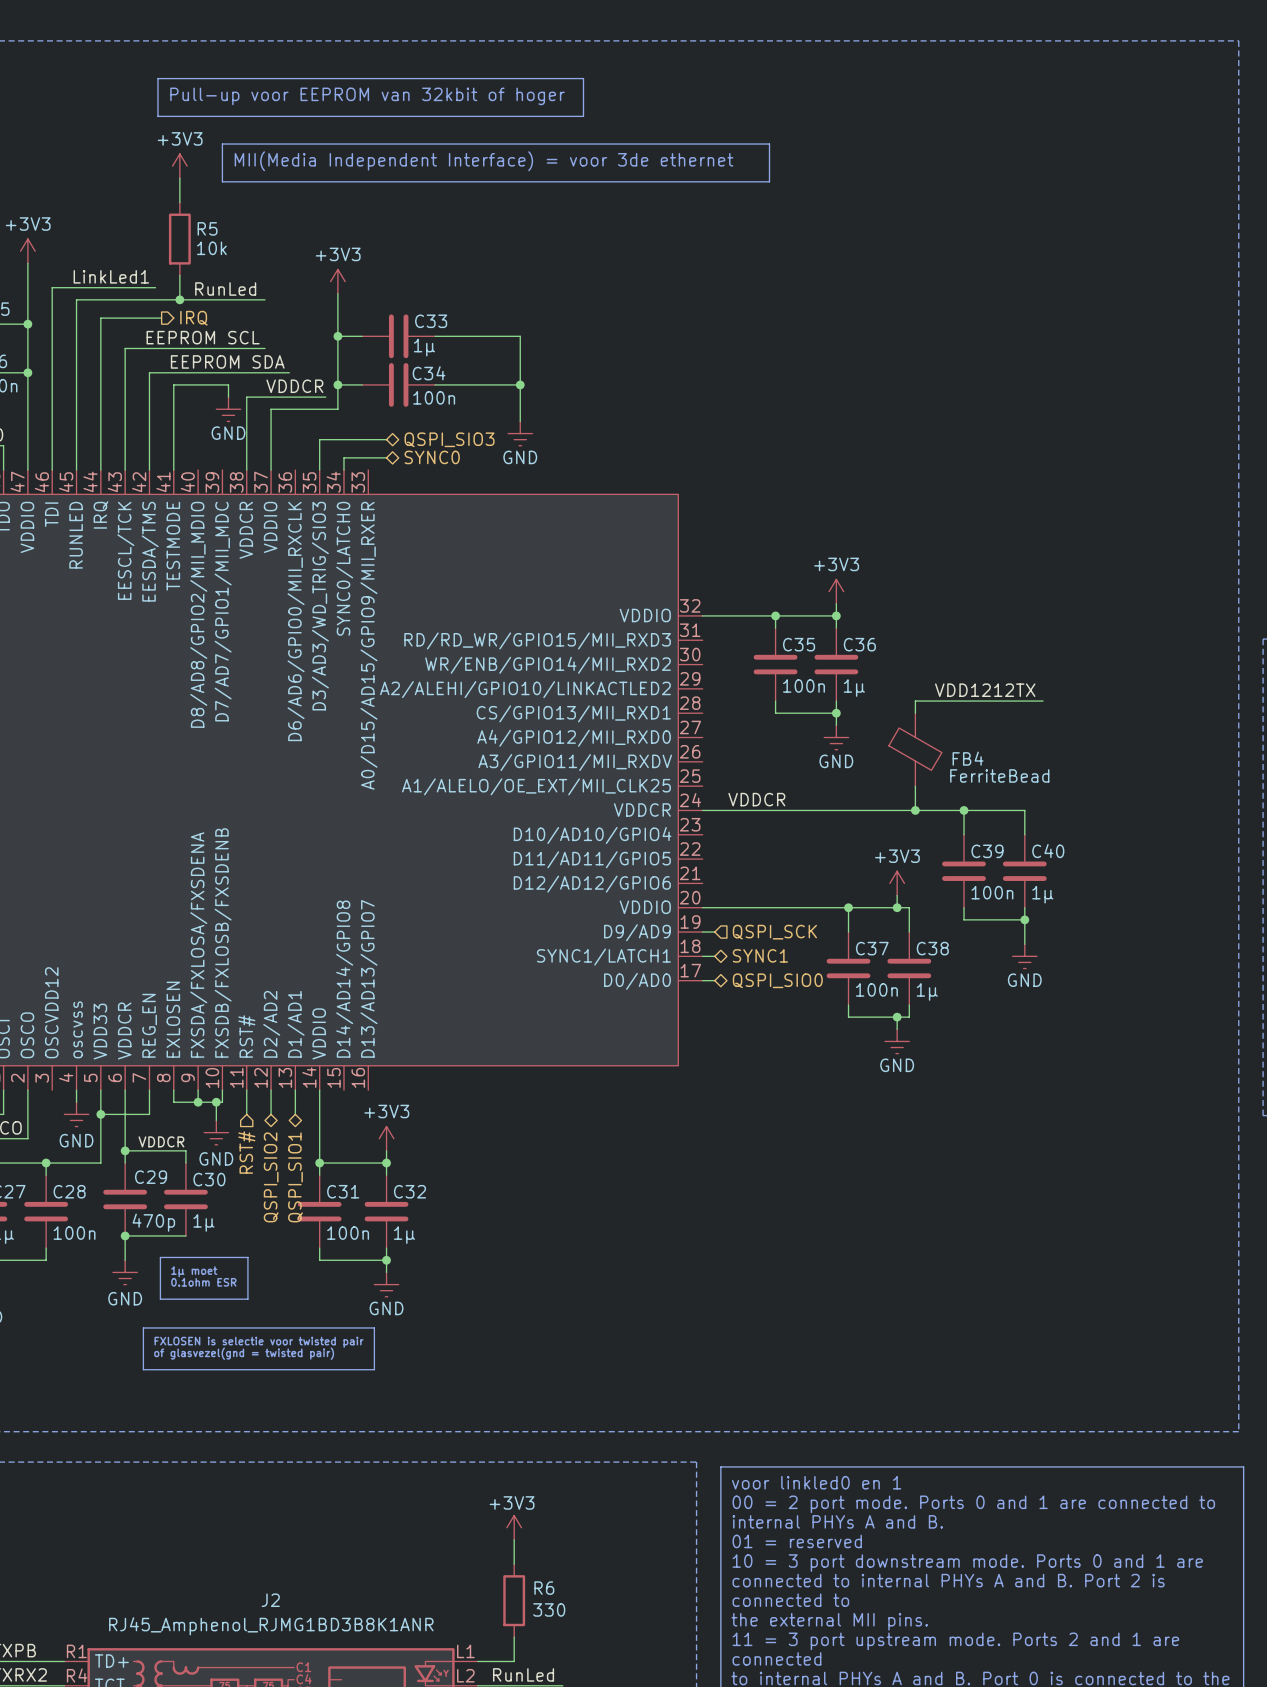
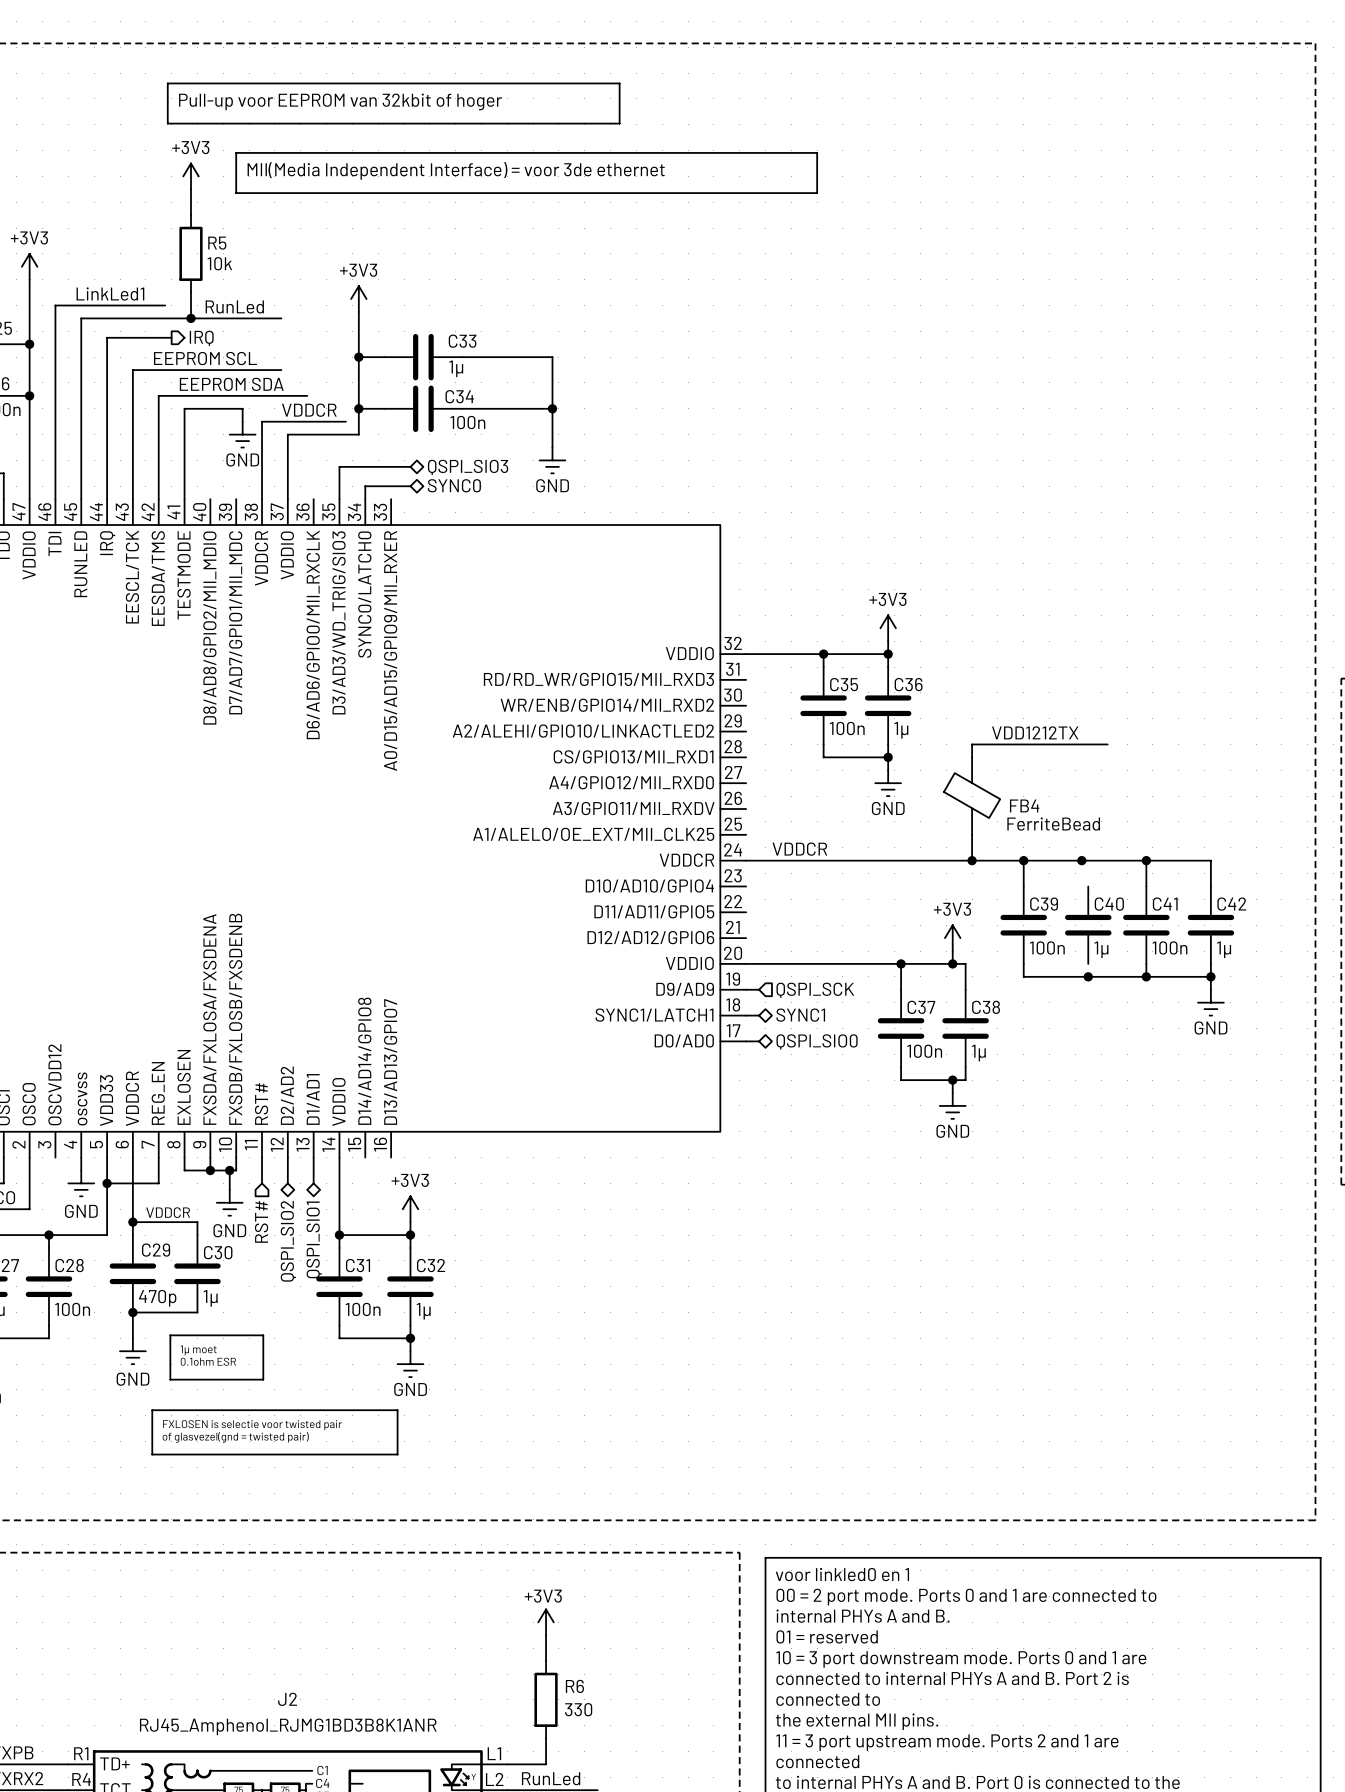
junction: none -> (1081, 860)
wire: (1024, 810) (1024, 834) -> (1088, 860) (1210, 860) (1210, 886)
wire: none -> (1146, 860) (1146, 886)
junction: none -> (1146, 860)
C41: none -> 100n (1146, 925)
C42: none -> 1µ (1210, 925)
wire: (1024, 907) (1024, 944) -> none
wire: none -> (1146, 963) (1146, 976)
wire: none -> (1210, 963) (1210, 989)
wire: none -> (1088, 976) (1210, 976)
junction: none -> (1146, 976)
junction: none -> (1210, 976)
power symbol position: GND (1024, 956) -> GND (1210, 1002)

